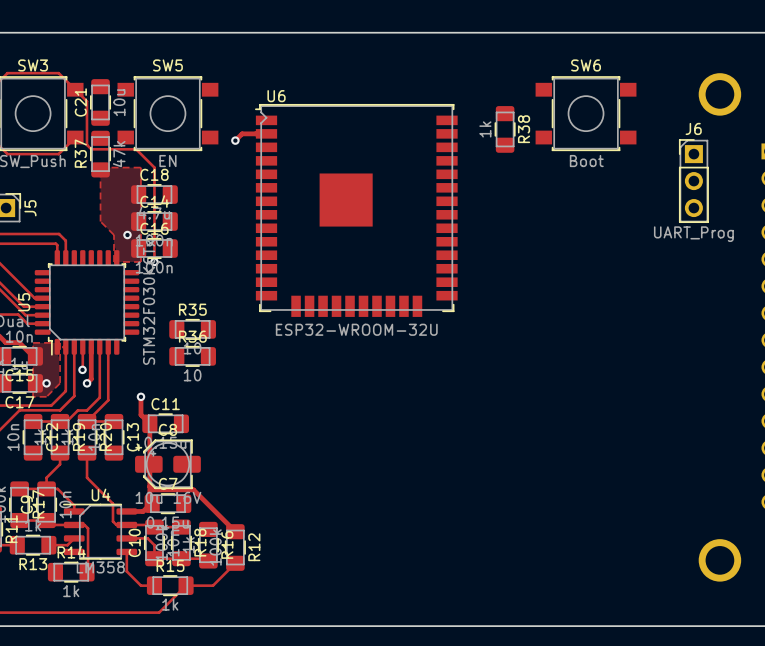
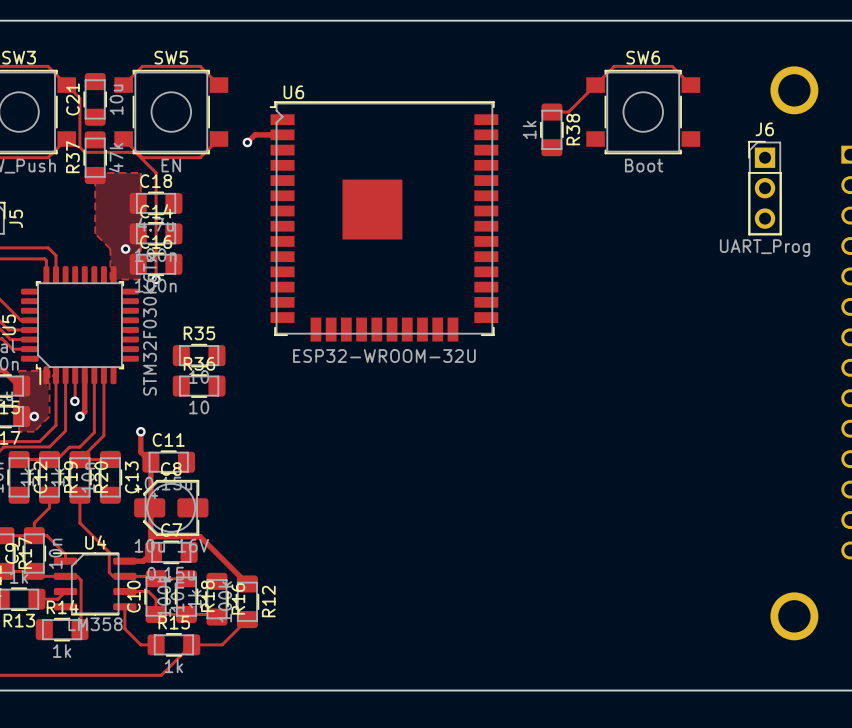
track: none -> (123, 85) (142, 66) (200, 66) (218, 85)
track: none -> (690, 85) (672, 66) (614, 66) (568, 112) (551, 112)
track: none -> (123, 139) (142, 157) (200, 157) (218, 139)

